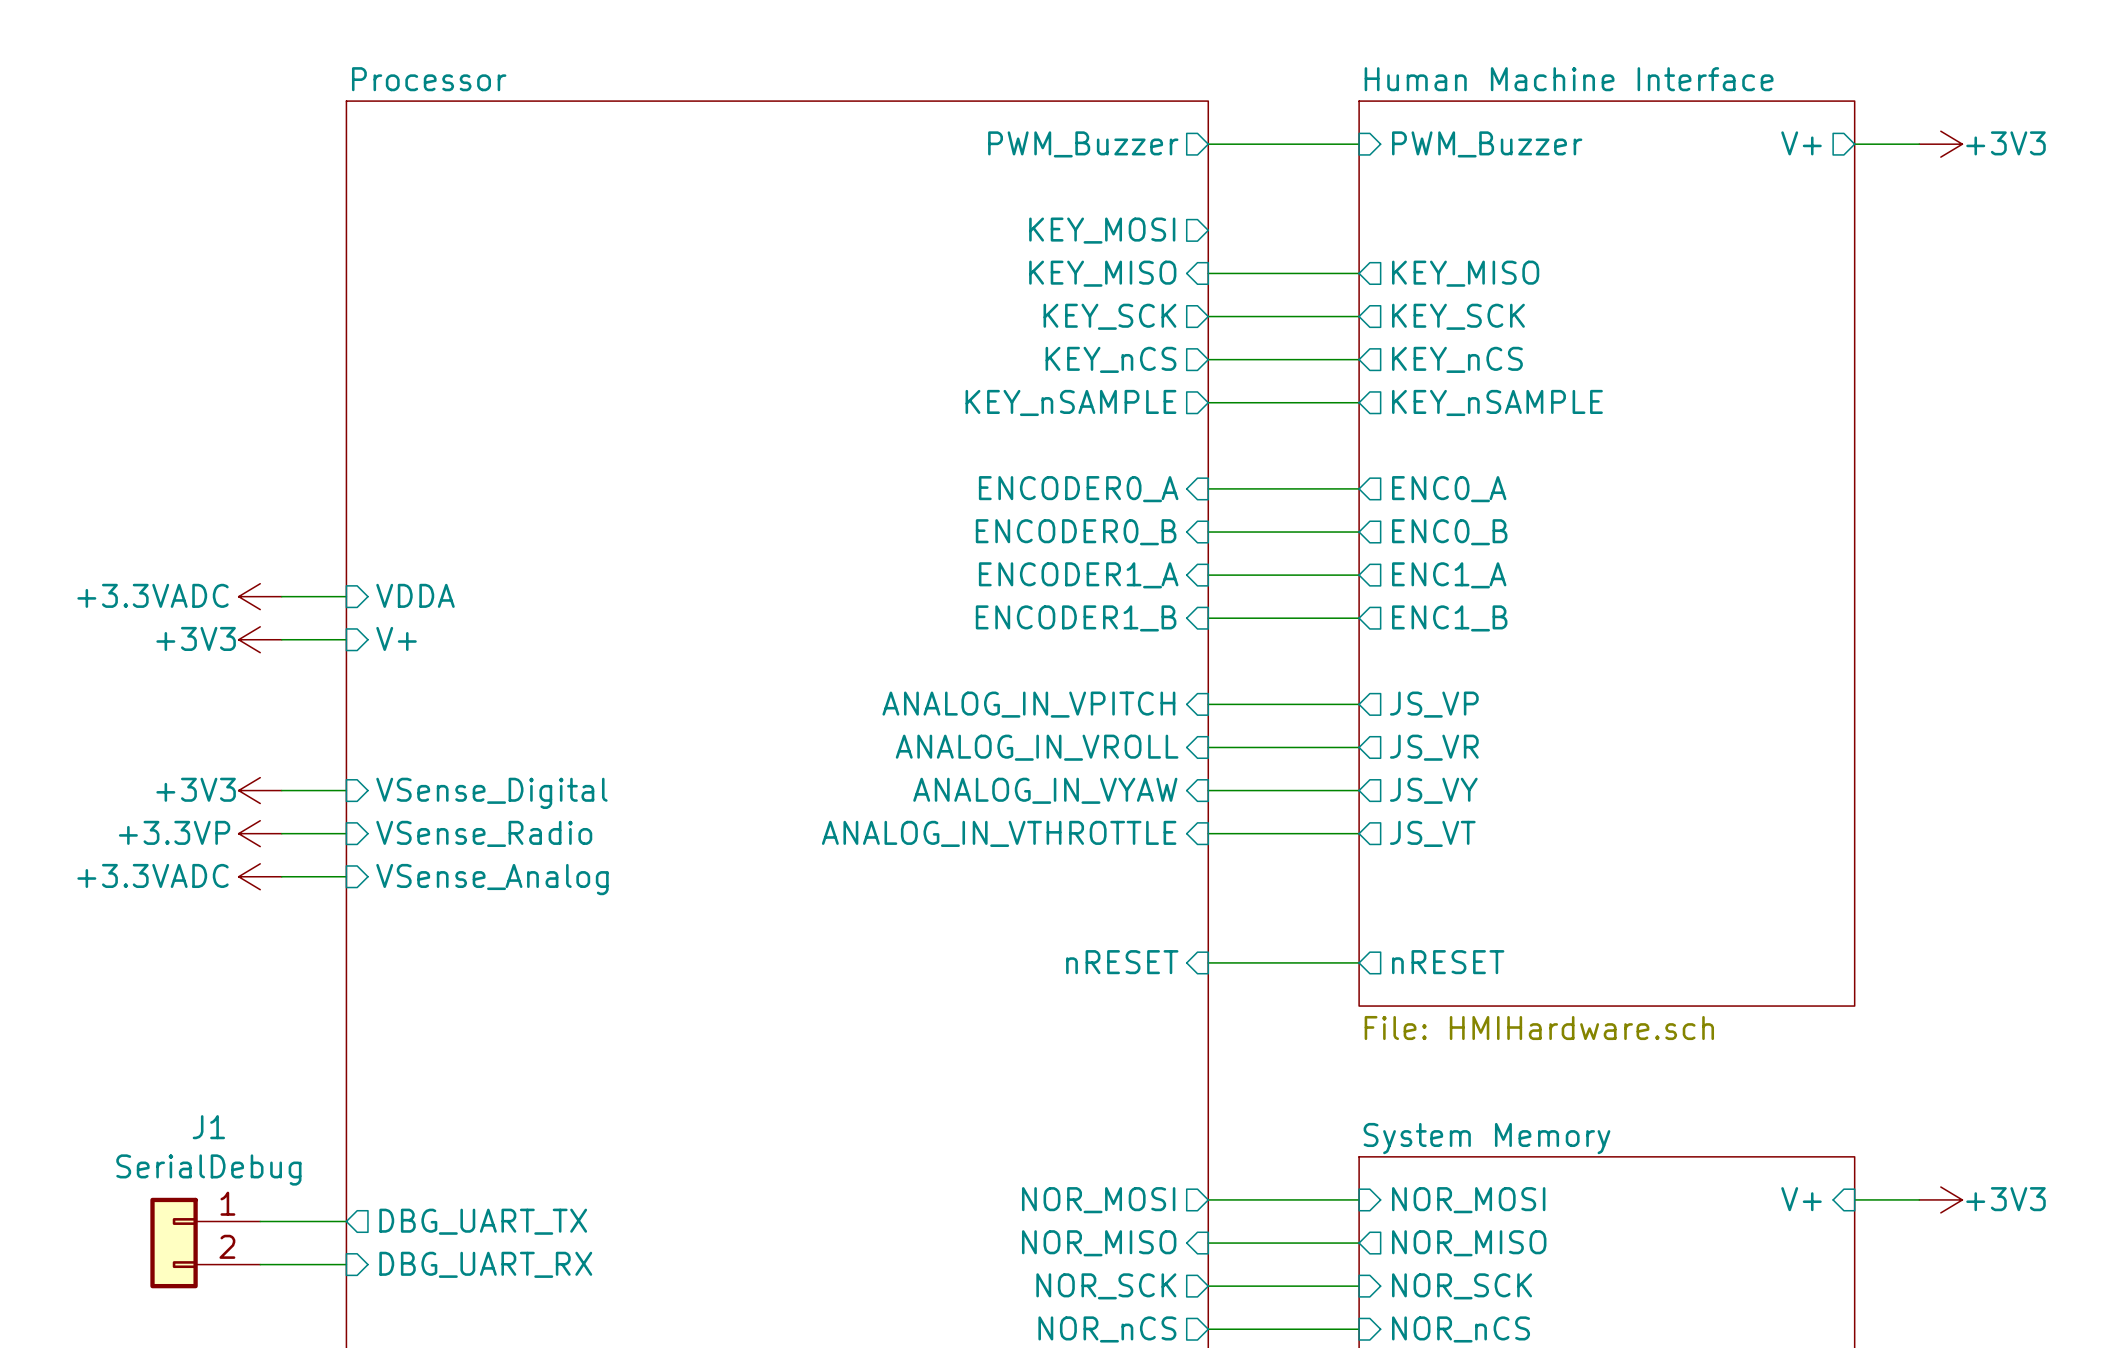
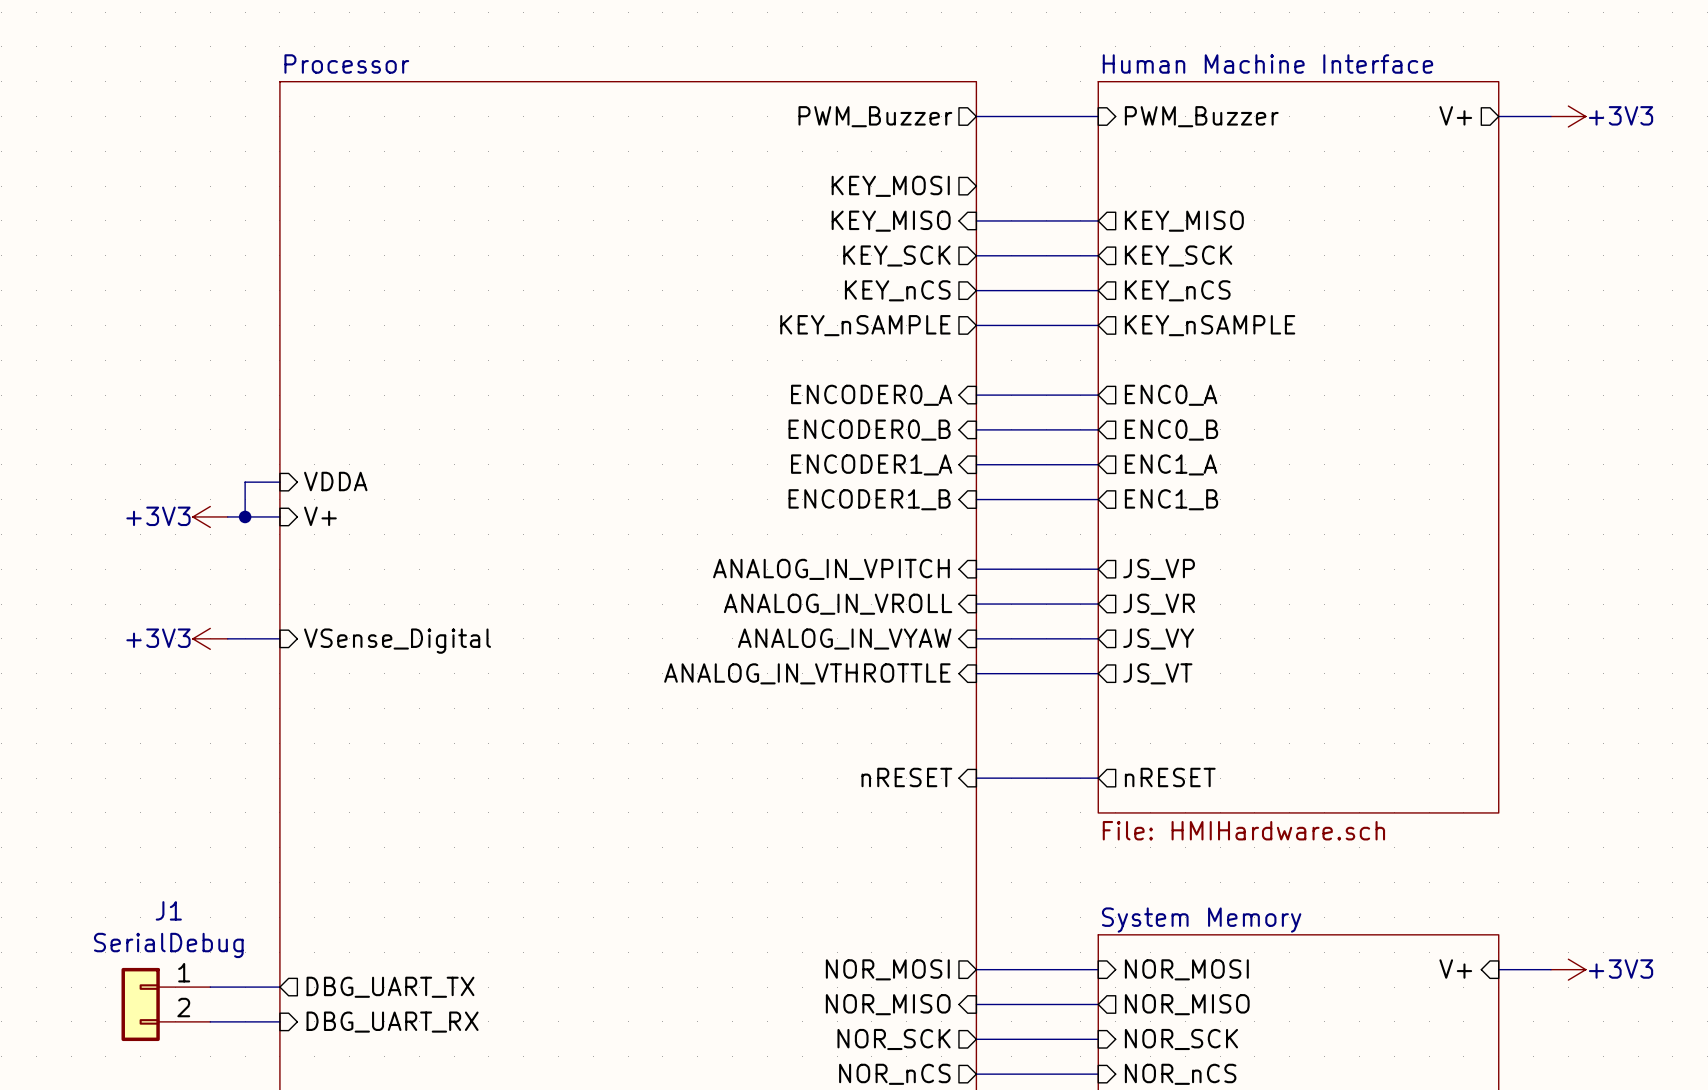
power symbol: +3.3VADC (260, 596) -> none
wire: (281, 596) (303, 596) -> (245, 516) (245, 482)
junction: none -> (245, 516)
power symbol: +3.3VP (260, 833) -> none
wire: (281, 833) (346, 833) -> none
sheet pin: VSense_Radio (484, 833) -> none
power symbol: +3.3VADC (260, 876) -> none
wire: (281, 876) (346, 876) -> none
sheet pin: VSense_Analog (492, 879) -> none

